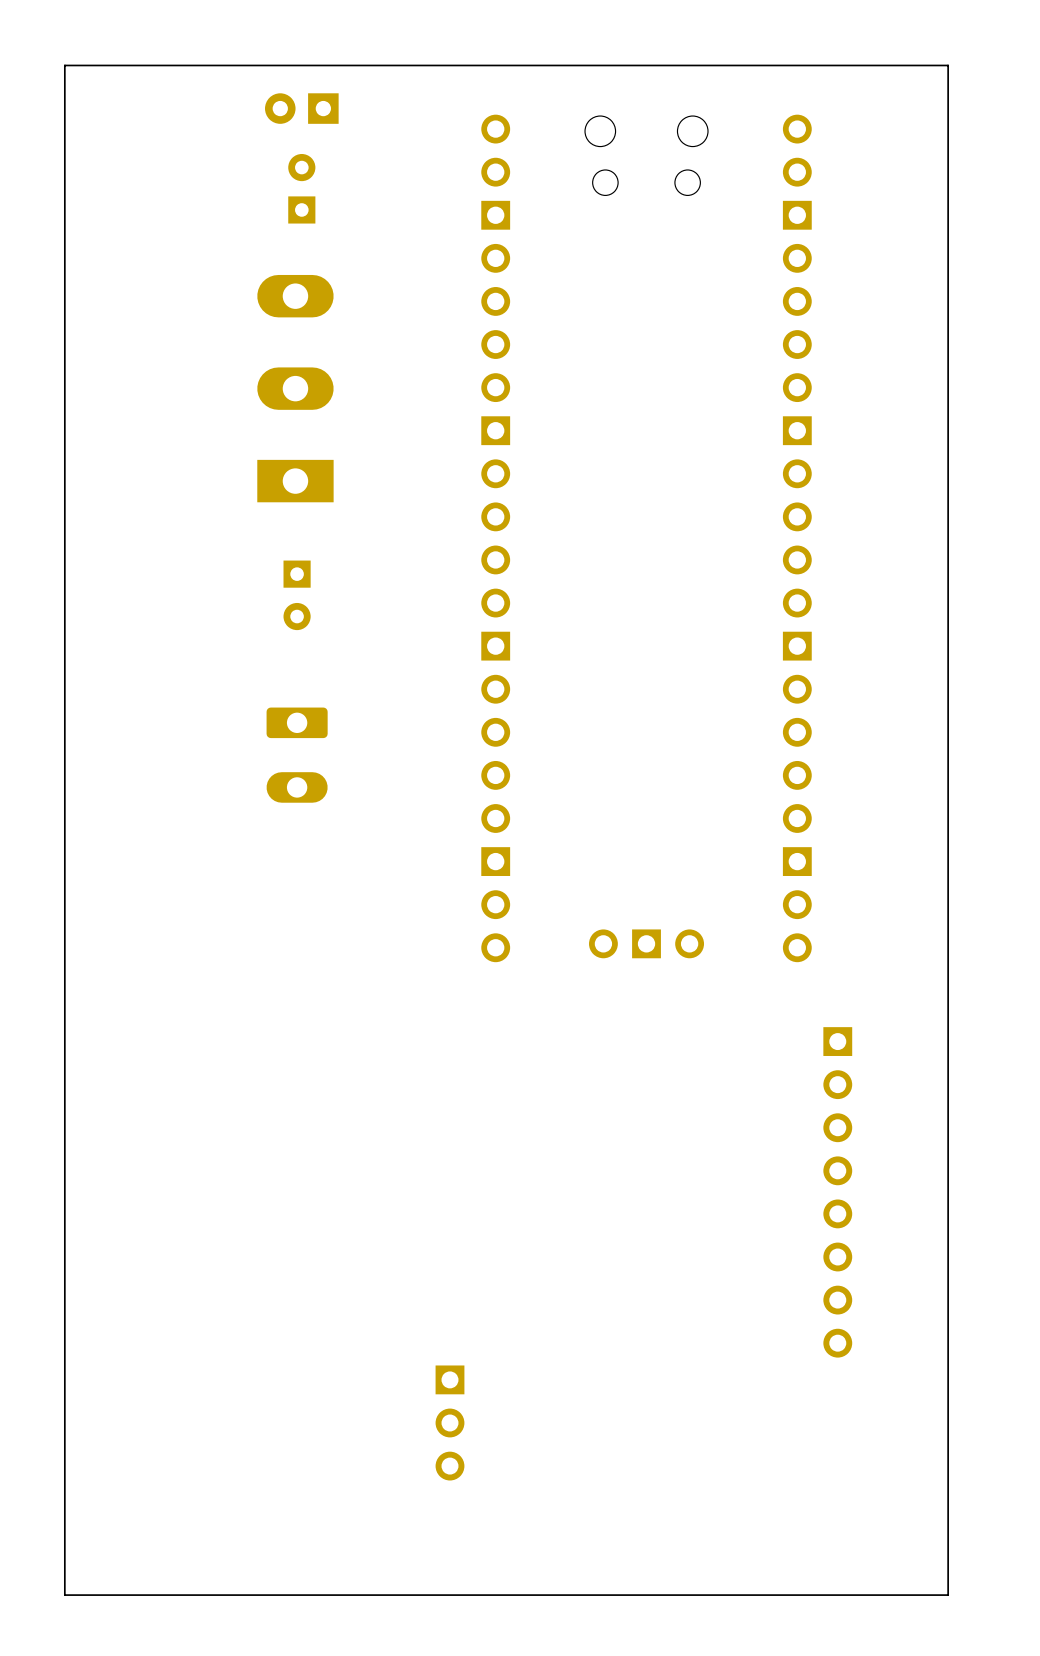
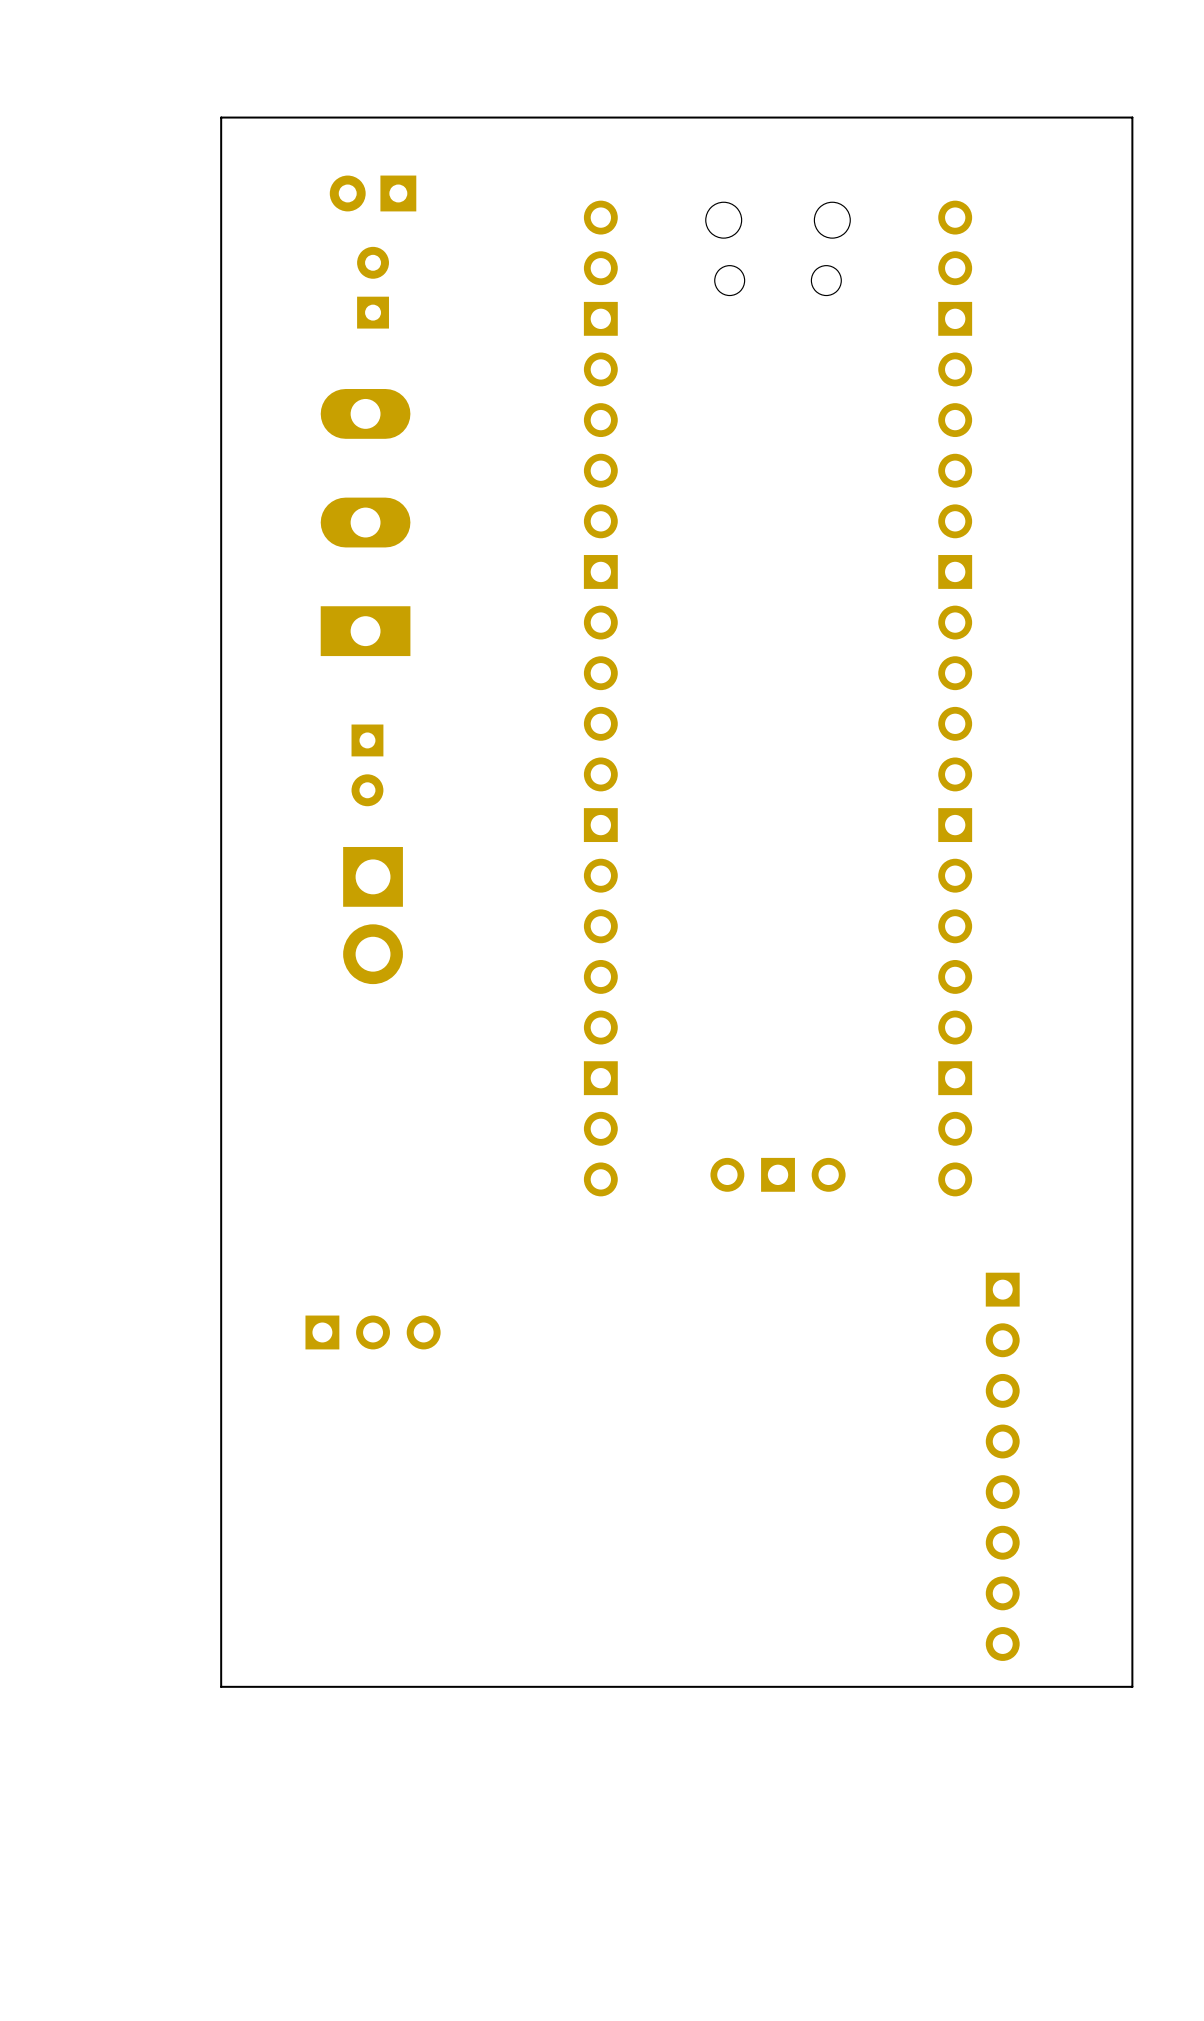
board edge: (948, 65) (64, 65) (64, 1595) (948, 1595) (948, 1379) -> (1132, 142) (1132, 117) (221, 117) (221, 1686) (1132, 1686)
part: none -> (373, 915)
part: (297, 755) -> none
part rotation: 0° (449, 1422) -> 90° counterclockwise (373, 1332)
part position: (449, 1422) -> (373, 1332)

